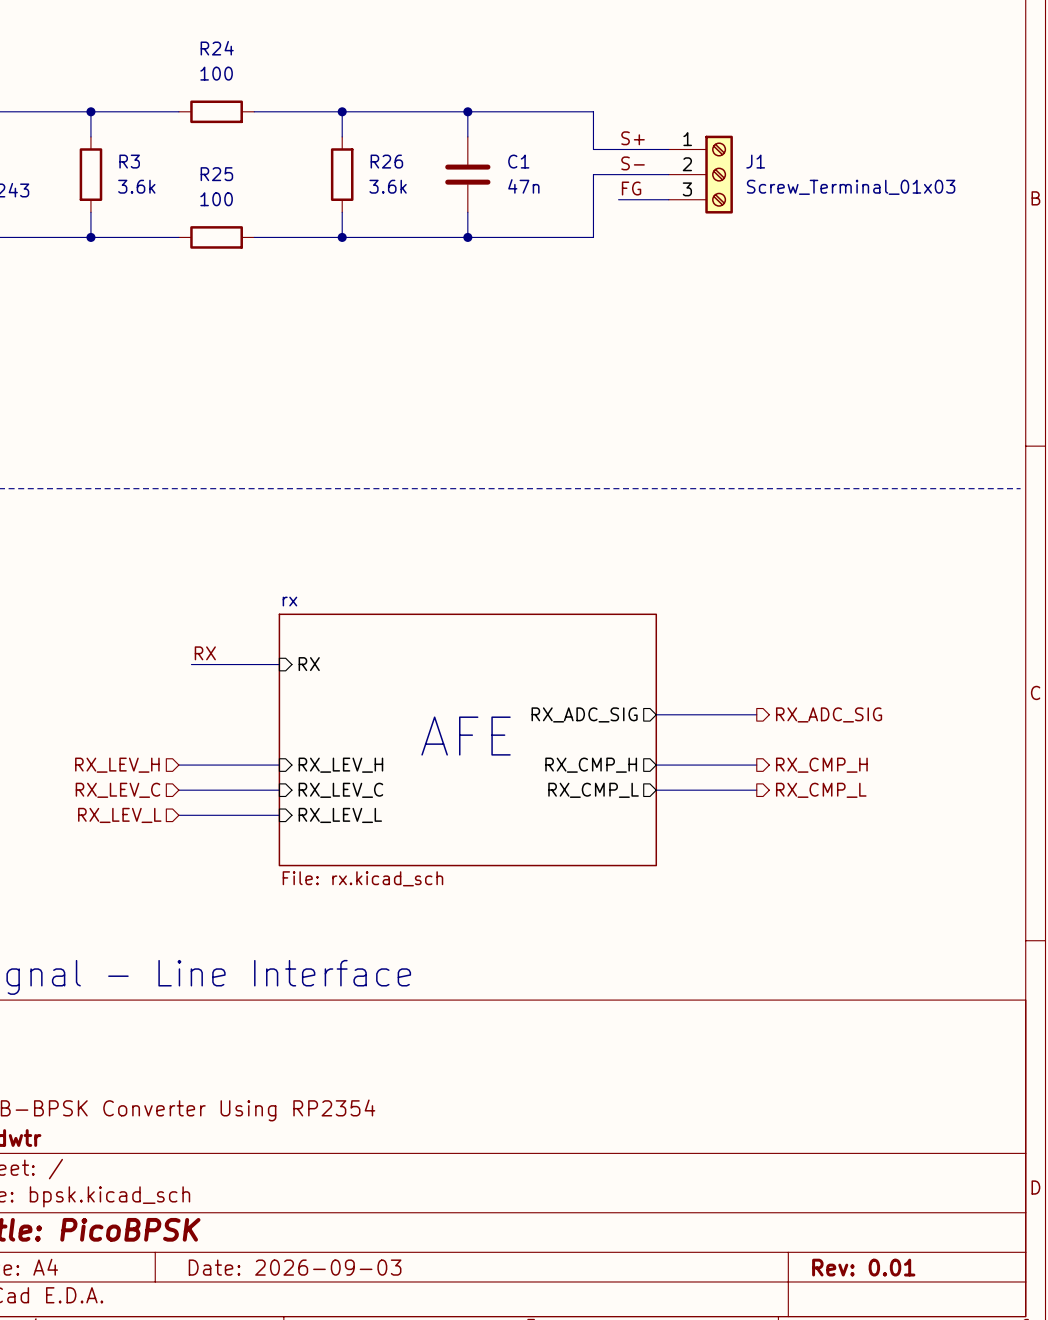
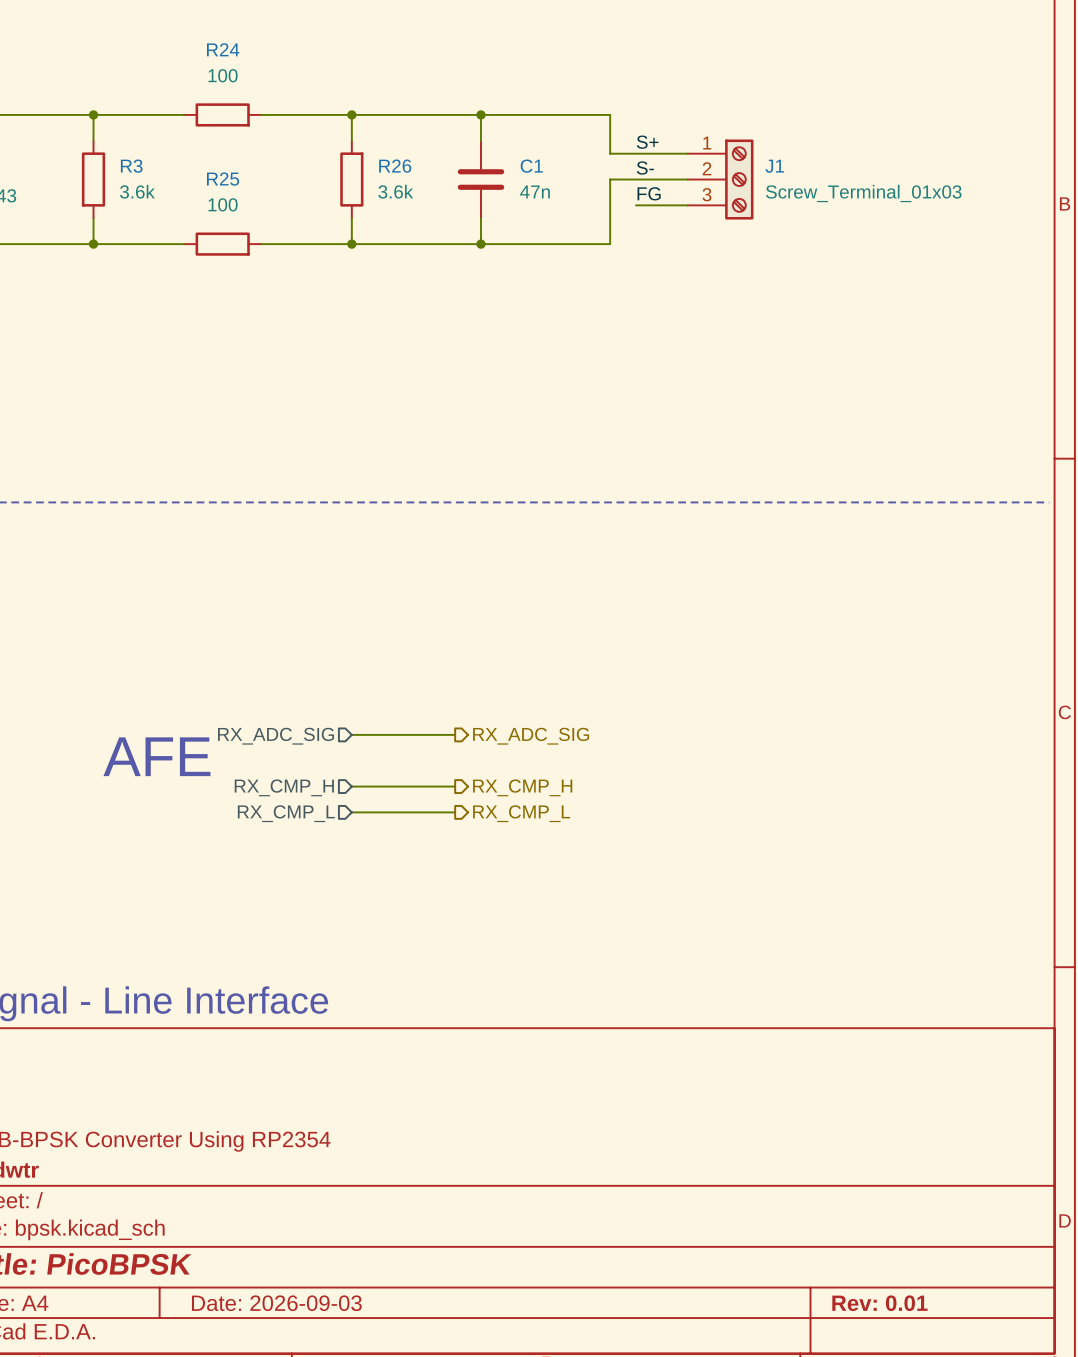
label: RX (205, 653) -> none
wire: (191, 664) (279, 664) -> none
sheet pin: RX (309, 664) -> none
sheet pin: none -> RX_ADC_SIG (276, 736)
hierarchical label: none -> RX_ADC_SIG (531, 736)
sheet pin: RX_ADC_SIG (584, 714) -> none
wire: (656, 714) (756, 714) -> none
hierarchical label: RX_ADC_SIG (829, 714) -> none
text: none -> AFE (156, 756)
text: AFE (466, 736) -> none
sheet rx: File: rx.kicad_sch (467, 739) -> none
hierarchical label: RX_LEV_H (117, 765) -> none
wire: (178, 765) (279, 765) -> (351, 786) (455, 786)
sheet pin shape: input (340, 765) -> output (284, 787)
sheet pin: RX_LEV_H (340, 765) -> RX_CMP_H (284, 787)
hierarchical label: none -> RX_CMP_H (522, 787)
sheet pin: RX_CMP_H (591, 765) -> none
wire: (656, 765) (756, 765) -> none
hierarchical label: RX_CMP_H (821, 765) -> none
hierarchical label: RX_LEV_C (117, 790) -> none
wire: (178, 790) (279, 790) -> (351, 812) (455, 812)
sheet pin: RX_LEV_C (340, 790) -> none
hierarchical label: none -> RX_CMP_L (521, 813)
sheet pin: RX_CMP_L (593, 790) -> none
wire: (656, 790) (756, 790) -> none
hierarchical label: RX_CMP_L (821, 790) -> none
hierarchical label: RX_LEV_L (119, 815) -> none
wire: (178, 815) (279, 815) -> (351, 734) (455, 734)
sheet pin shape: input (340, 815) -> output (286, 813)
sheet pin: RX_LEV_L (340, 815) -> RX_CMP_L (286, 813)

